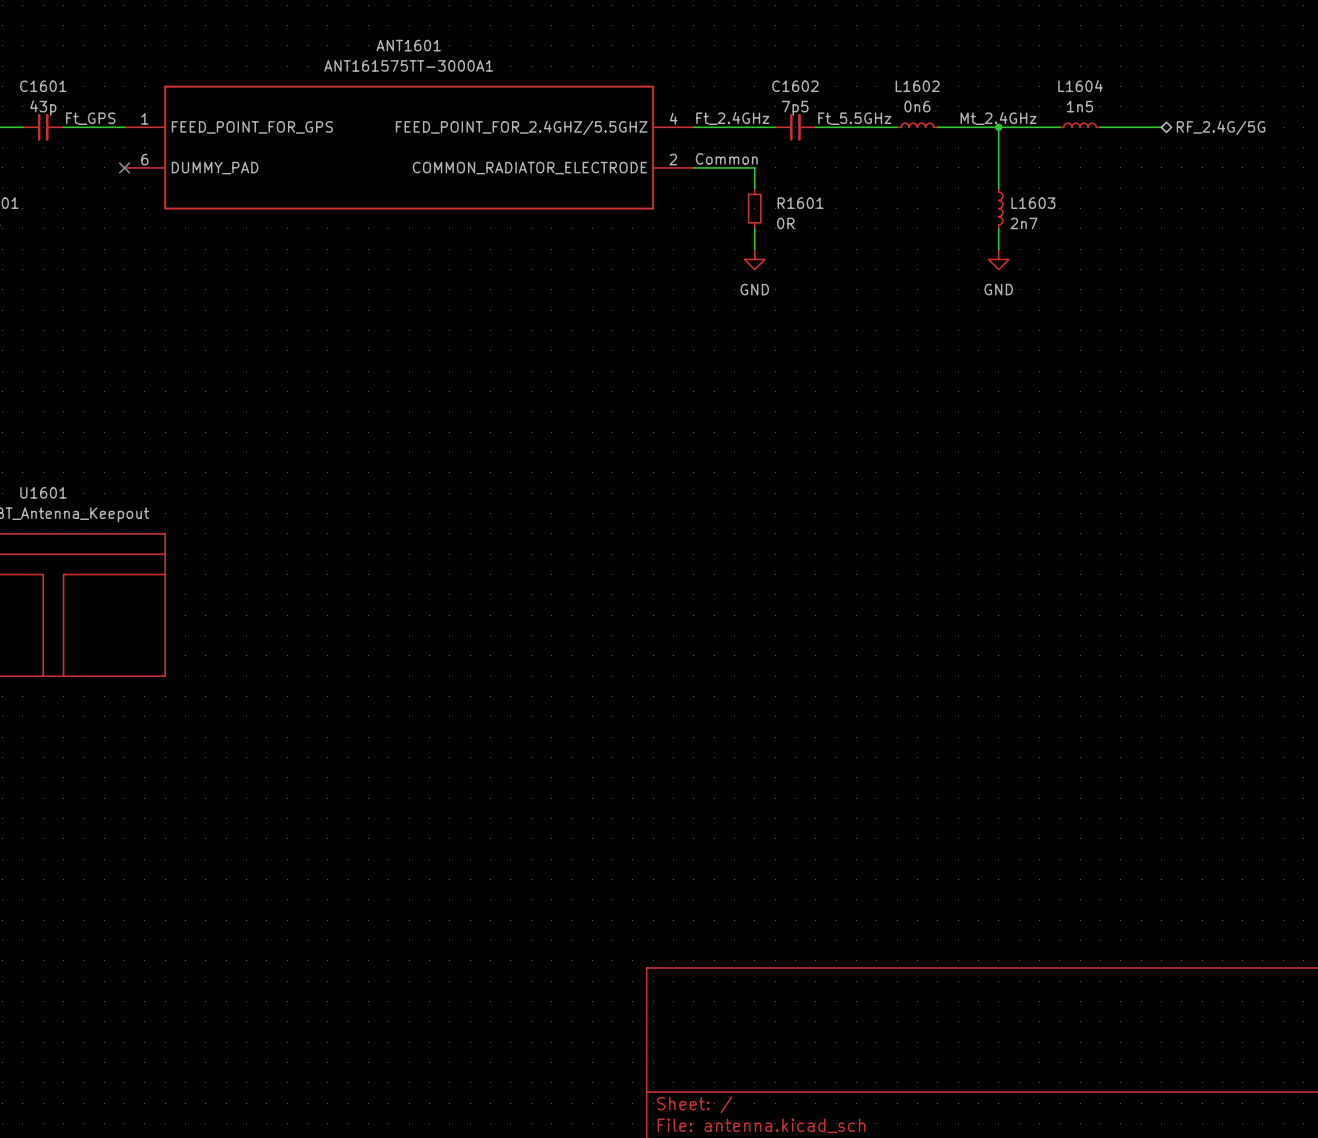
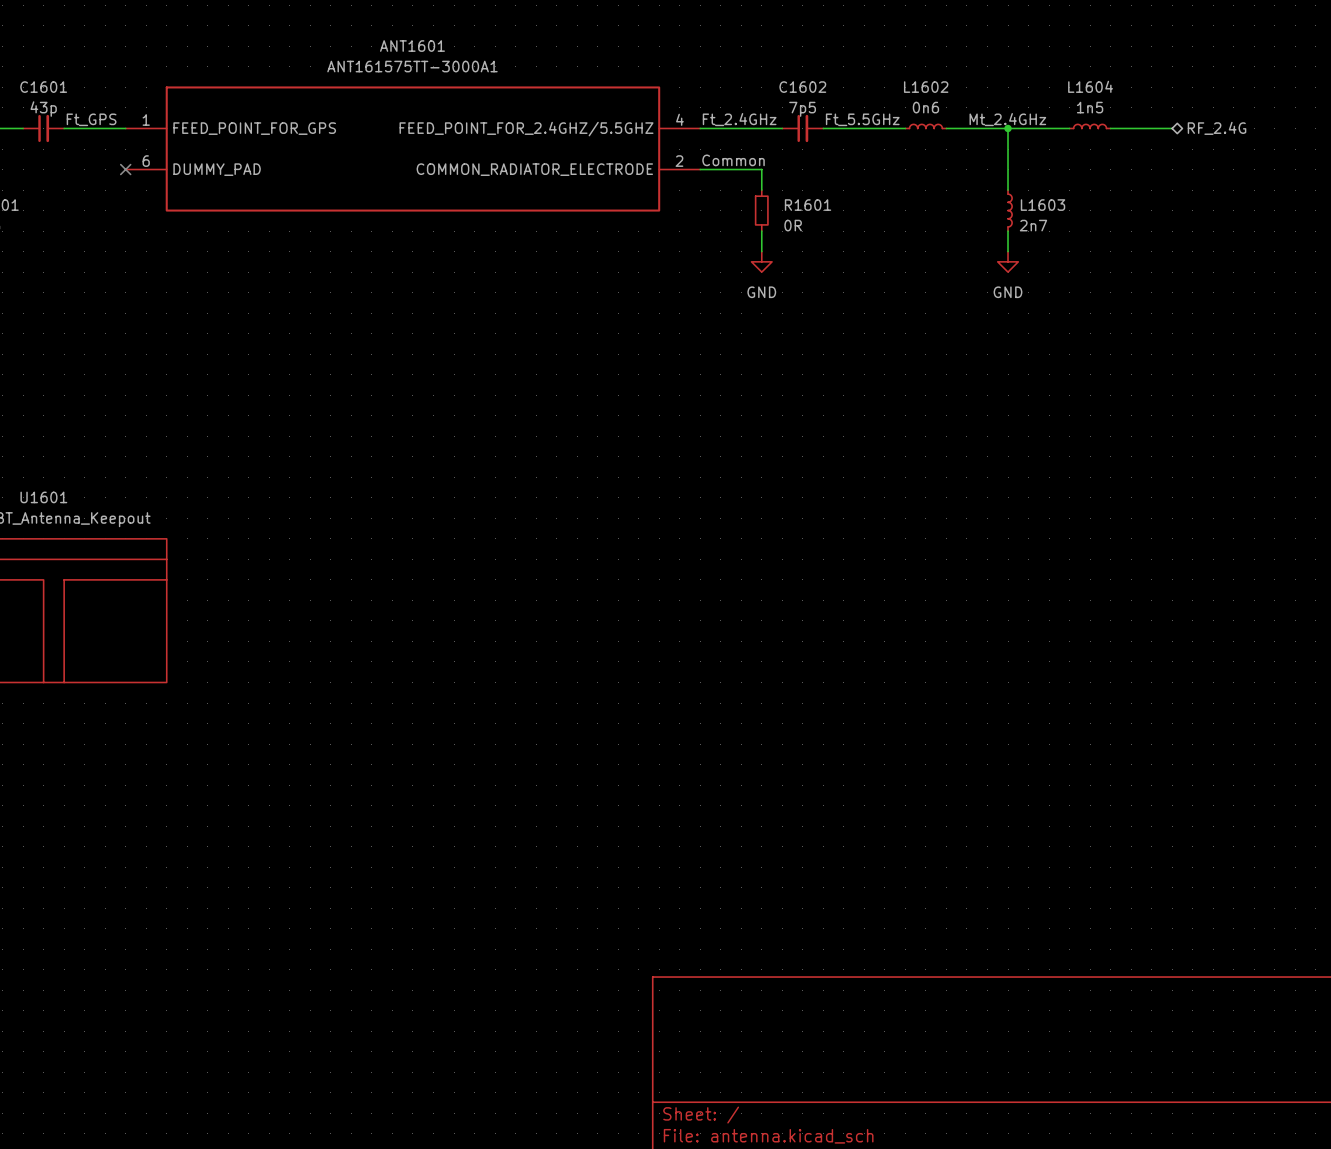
hierarchical label: RF_2.4G/5G (1221, 127) -> RF_2.4G (1217, 128)

